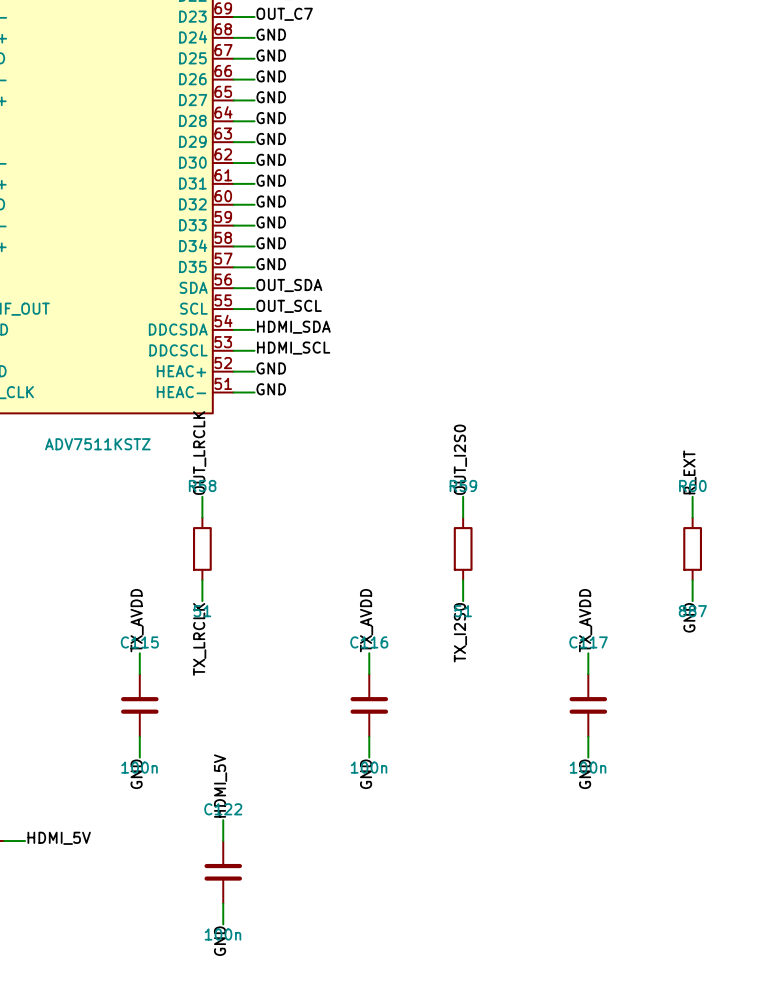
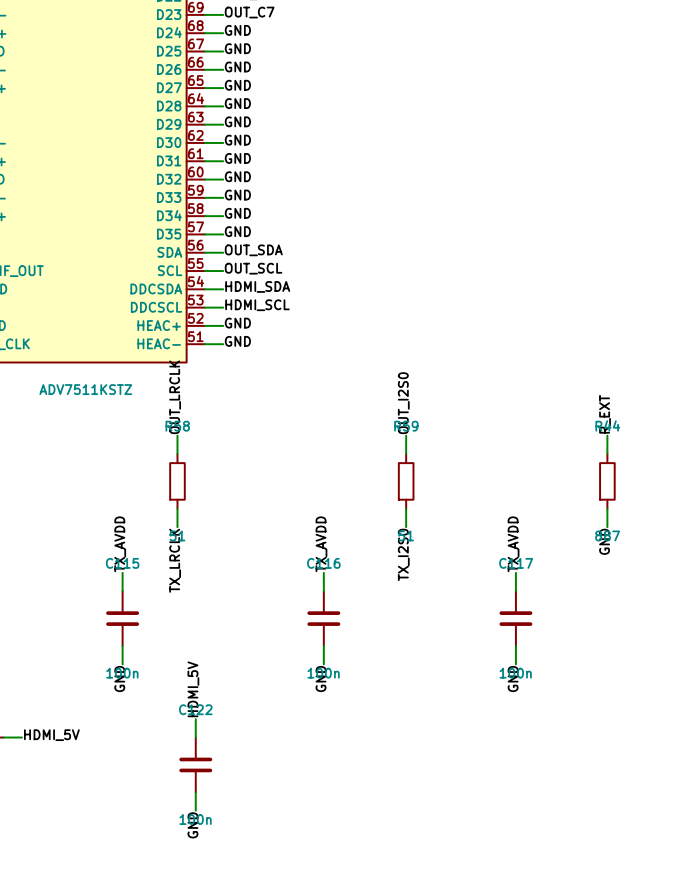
R60 name: R60 (692, 485) -> R44 (607, 425)

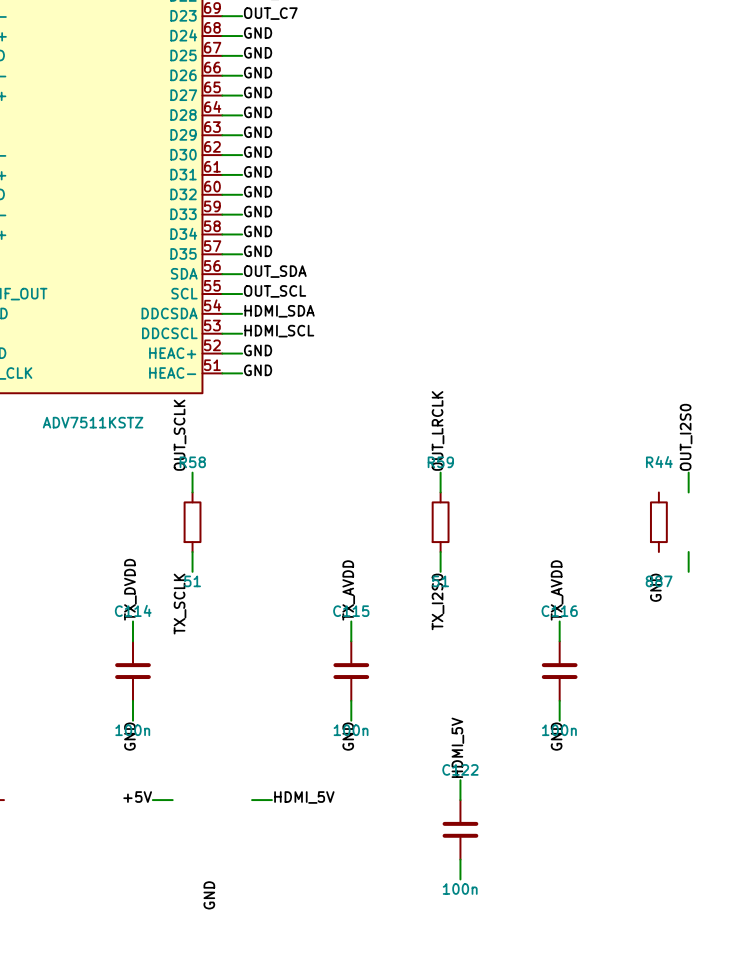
label: OUT_LRCLK (175, 397) -> OUT_SCLK (180, 435)
label: OUT_I2S0 (403, 403) -> OUT_LRCLK (438, 430)
label: none -> OUT_I2S0 (686, 437)
label: R_EXT (605, 414) -> none
wire: (607, 435) (607, 453) -> (688, 472) (688, 492)
wire: (607, 508) (607, 527) -> (688, 552) (688, 571)
label: TX_AVDD (120, 544) -> TX_DVDD (130, 589)
label: TX_LRCLK (175, 560) -> TX_SCLK (180, 604)
C115 name: C115 (122, 563) -> C114 (133, 610)
C116 name: C116 (323, 563) -> C115 (351, 611)
C117 name: C117 (516, 563) -> C116 (559, 611)
label rotation: 0° (193, 689) -> 90° clockwise (304, 797)
label position: HDMI_5V (193, 689) -> HDMI_5V (304, 797)
label: none -> HDMI_5V (457, 747)
wire: (195, 719) (195, 737) -> none
wire: none -> (460, 780) (460, 800)
label: none -> +5V (137, 797)
label: HDMI_5V (51, 735) -> none
wire: (3, 737) (21, 737) -> (152, 800) (172, 800)
wire: none -> (252, 800) (271, 800)
C122 position: (195, 764) -> (460, 829)
wire: (195, 792) (195, 810) -> none
wire: none -> (460, 859) (460, 879)

